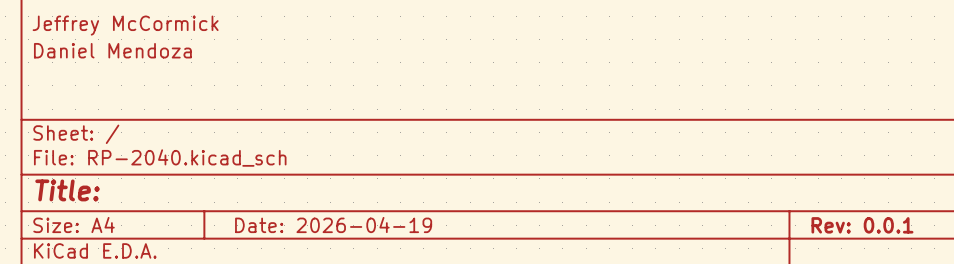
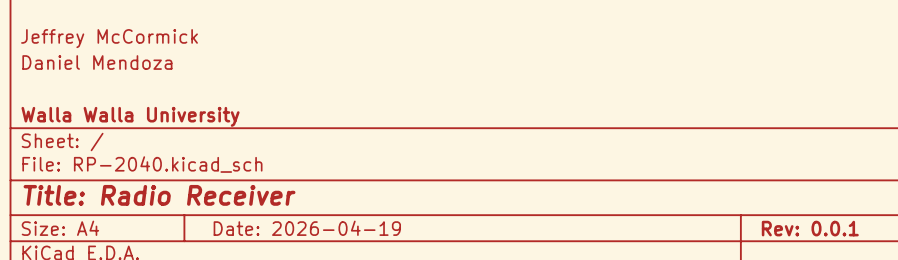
title block: none -> Walla Walla University (130, 116)
title block: Title: (67, 190) -> Title: Radio Receiver (159, 195)

